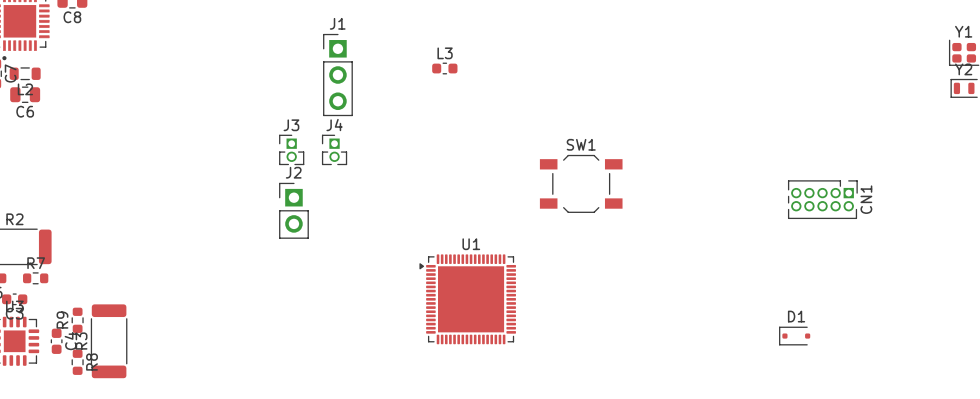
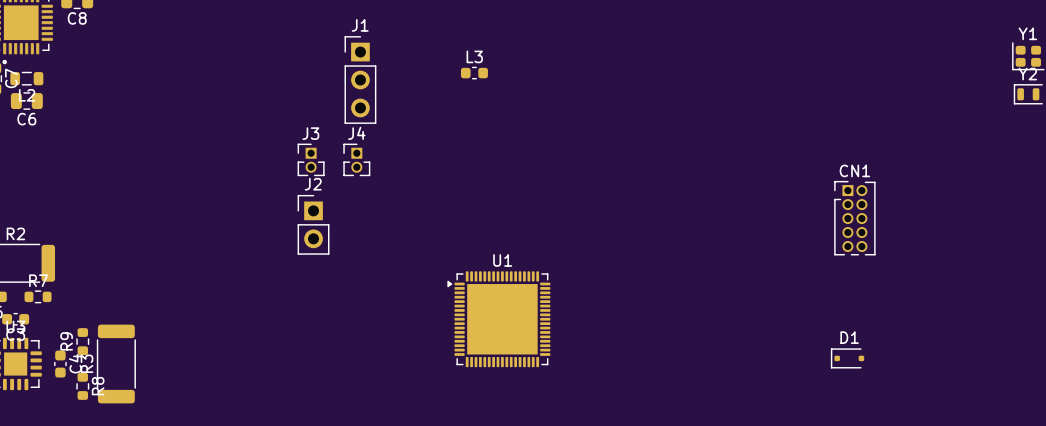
SW1: (581, 183) -> none
CN1 rotation: 0° (822, 199) -> 90° counterclockwise (854, 218)

